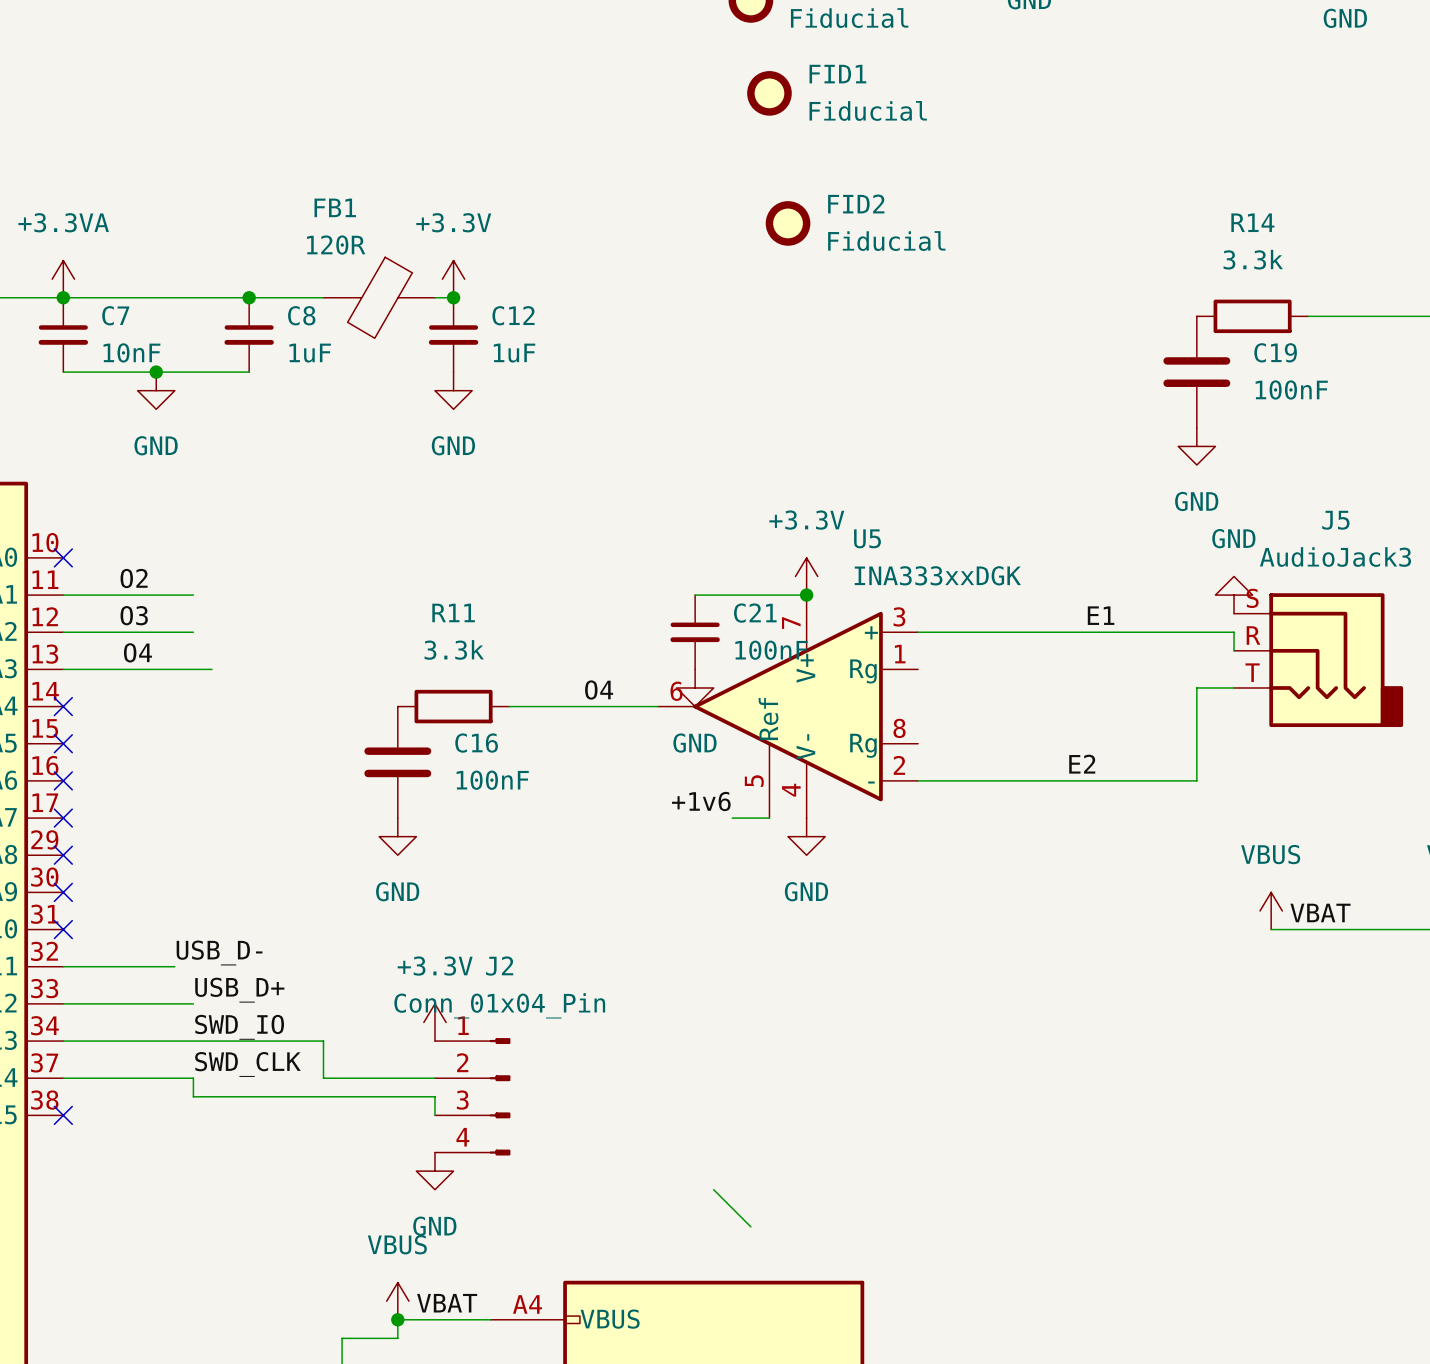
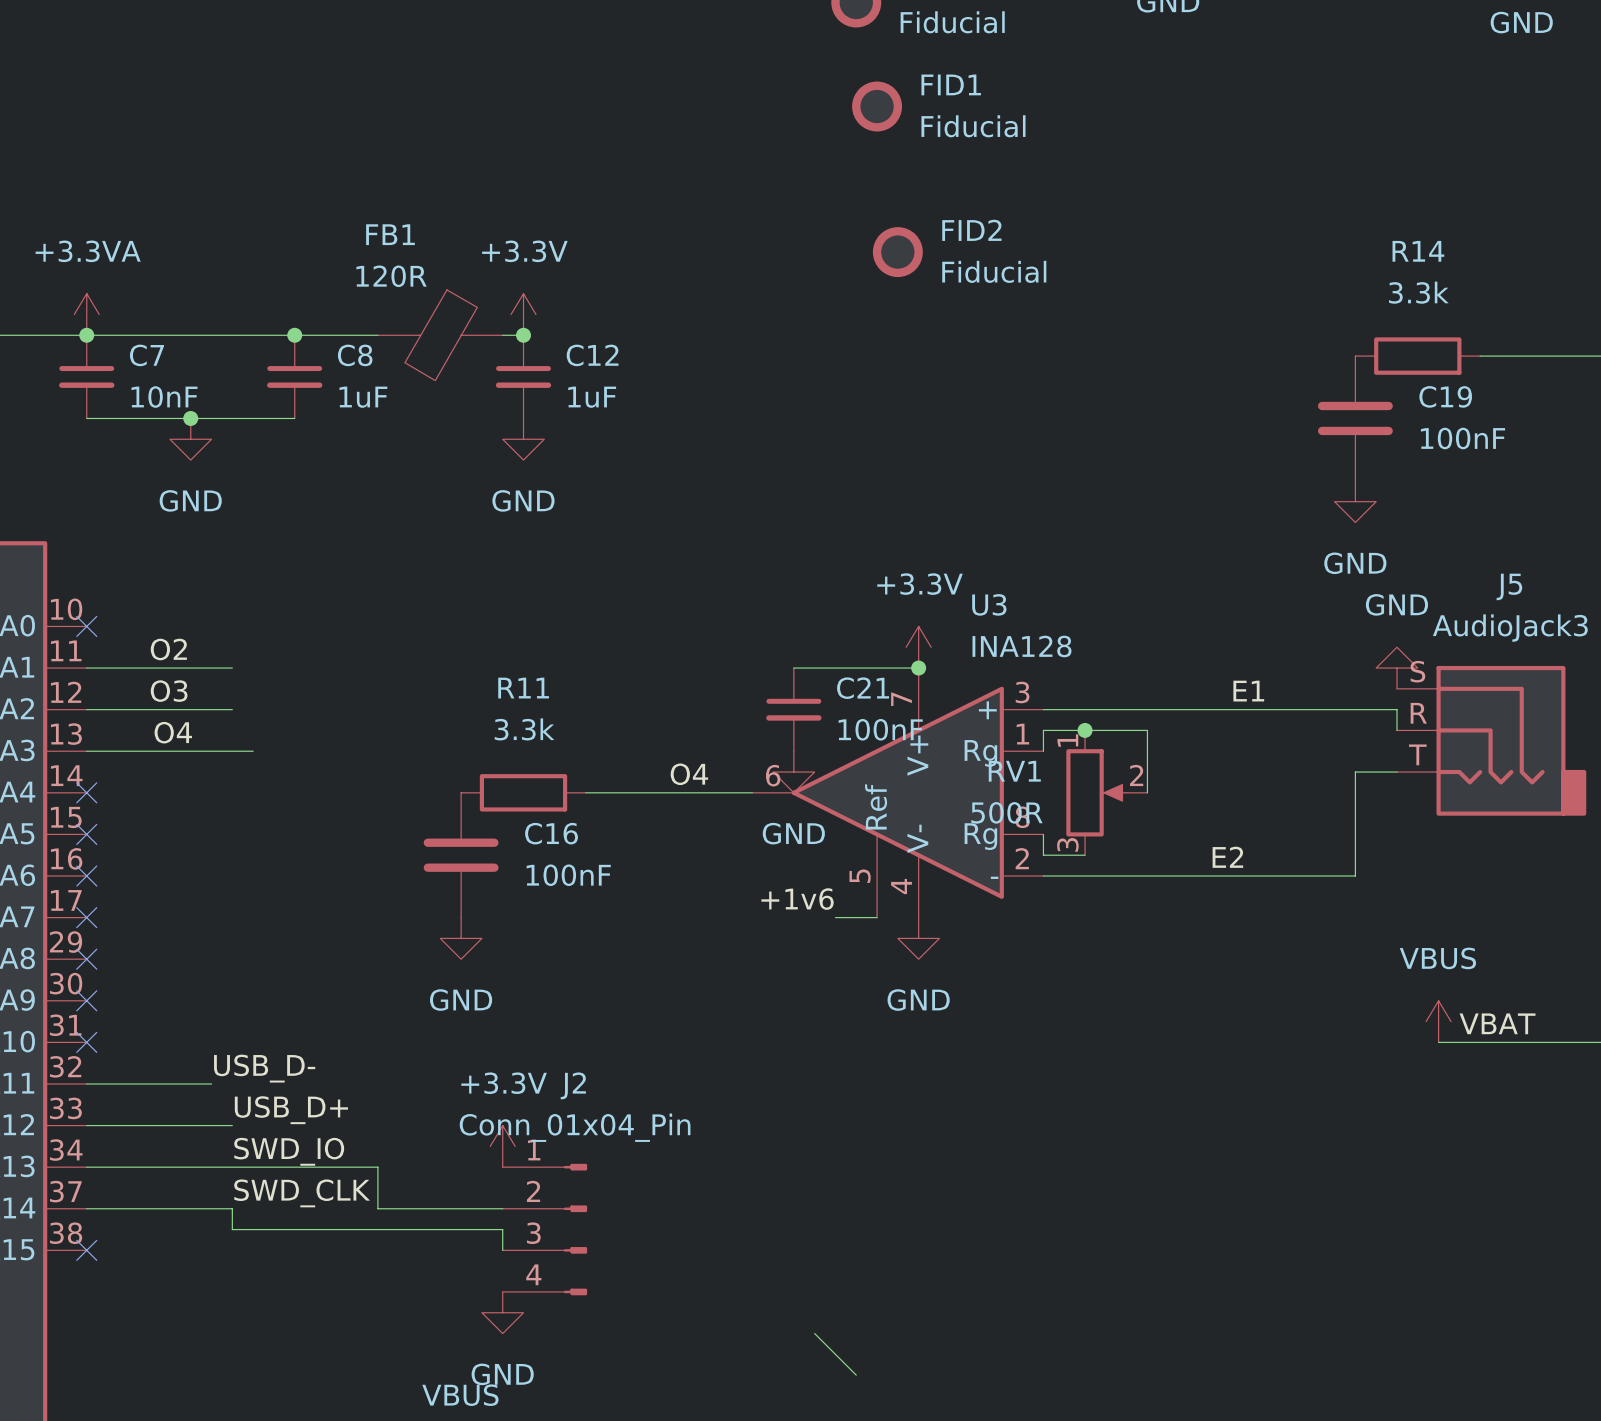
U5 name: U5 (867, 538) -> U3 (989, 604)
U5 value: INA333xxDGK (937, 575) -> INA128 (1022, 646)
junction: none -> (1085, 730)
wire: none -> (1043, 751) (1043, 730) (1147, 730) (1147, 792)
RV1: none -> 500R (1106, 792)
wire: none -> (1043, 834) (1043, 855) (1085, 855)

